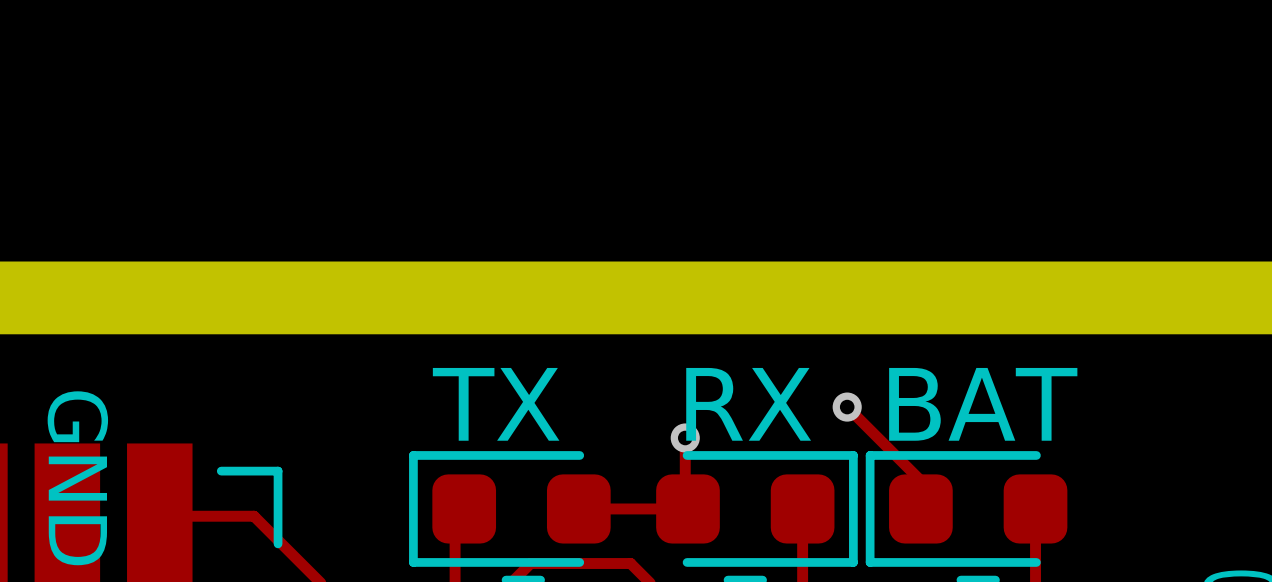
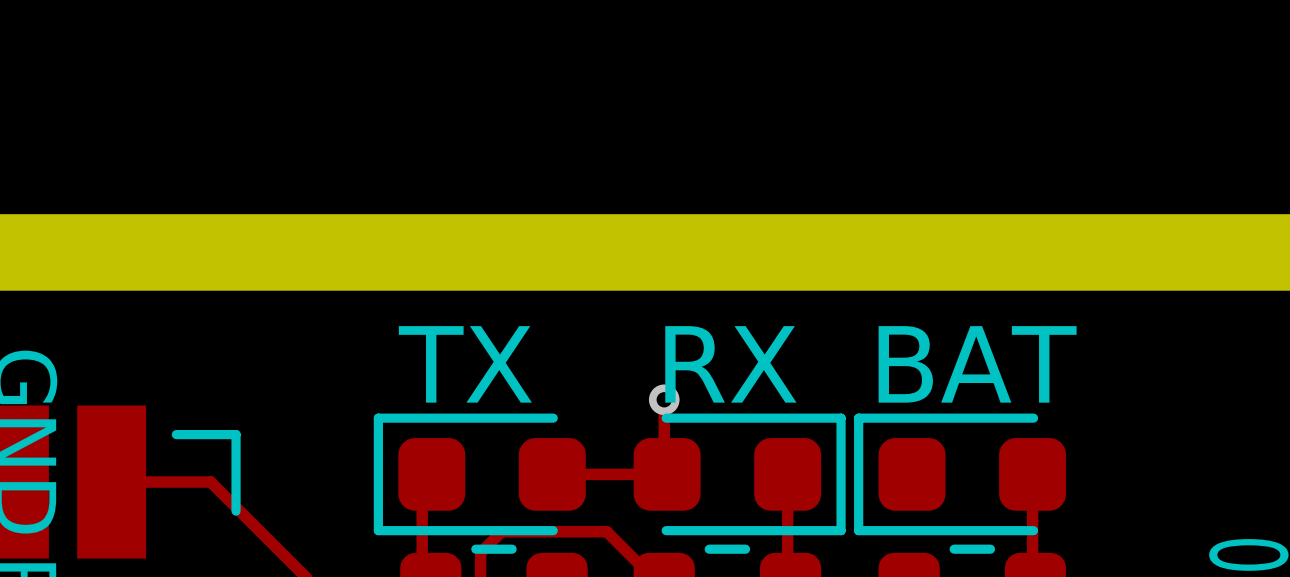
track: (847, 407) (920, 480) (920, 508) -> none
via: (847, 407) -> none

